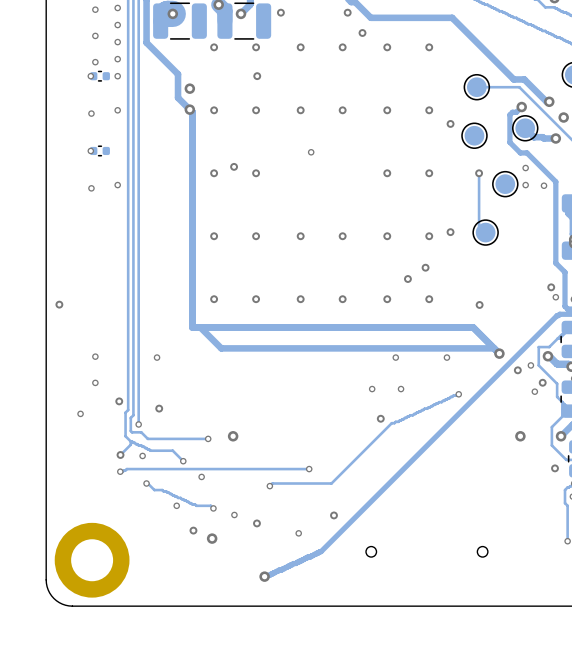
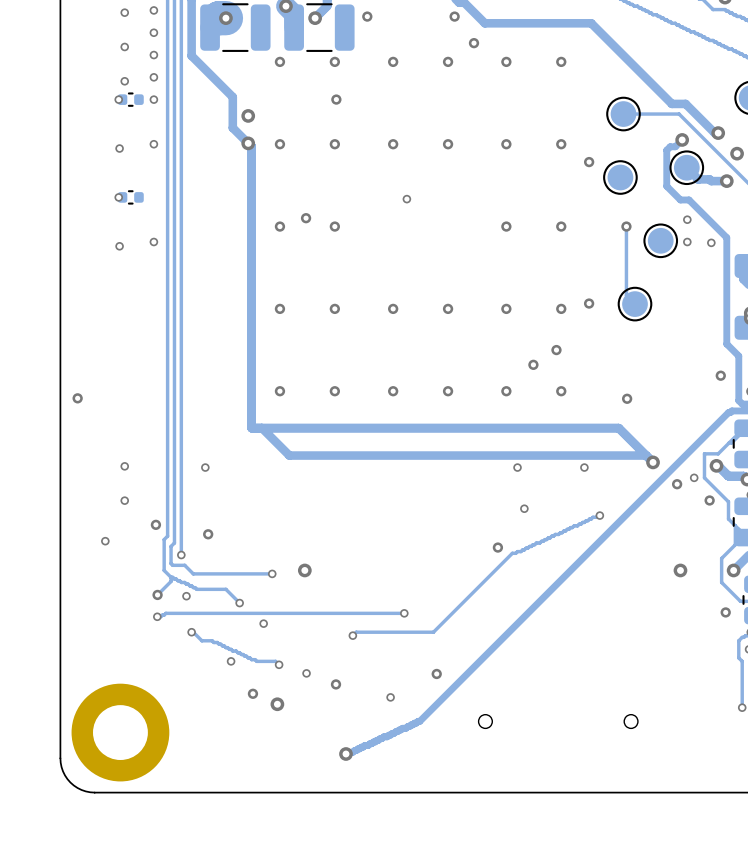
via: (555, 297) -> none
via: (372, 389) -> none
via: (534, 391) -> none

